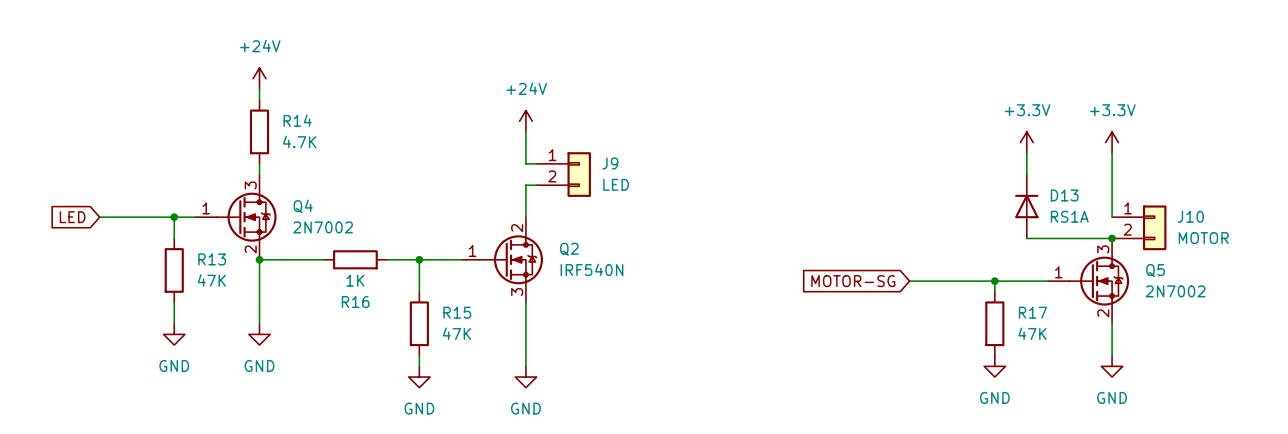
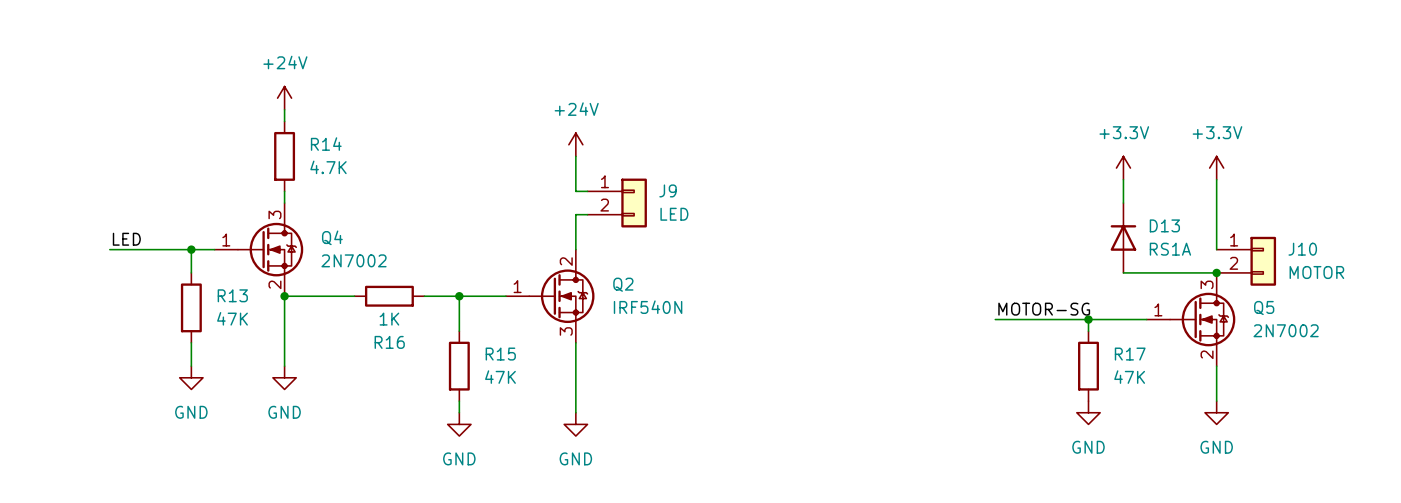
label: none -> LED (126, 239)
global label: LED (72, 217) -> none
label: none -> MOTOR-SG (1044, 309)
global label: MOTOR-SG (853, 281) -> none

